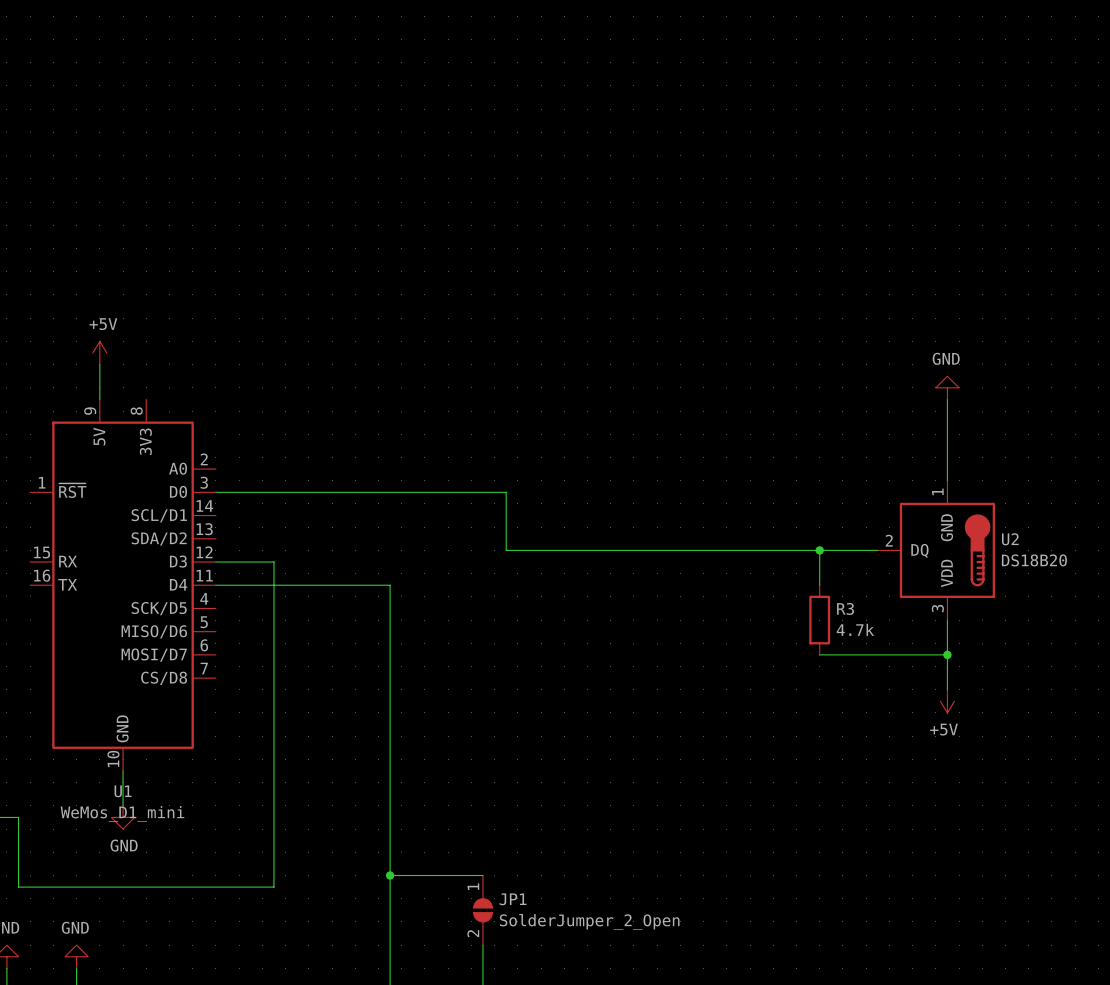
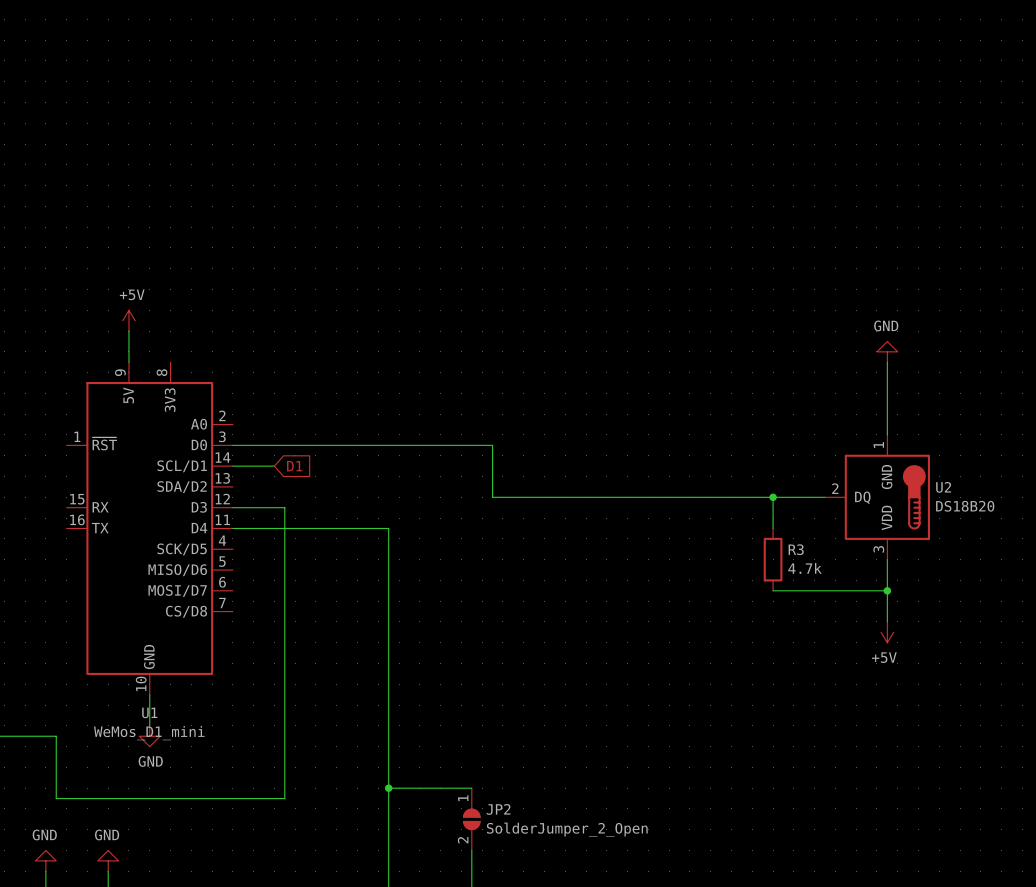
wire: none -> (232, 466) (274, 466)
global label: none -> D1 (294, 466)
JP1 name: JP1 (513, 899) -> JP2 (498, 809)

